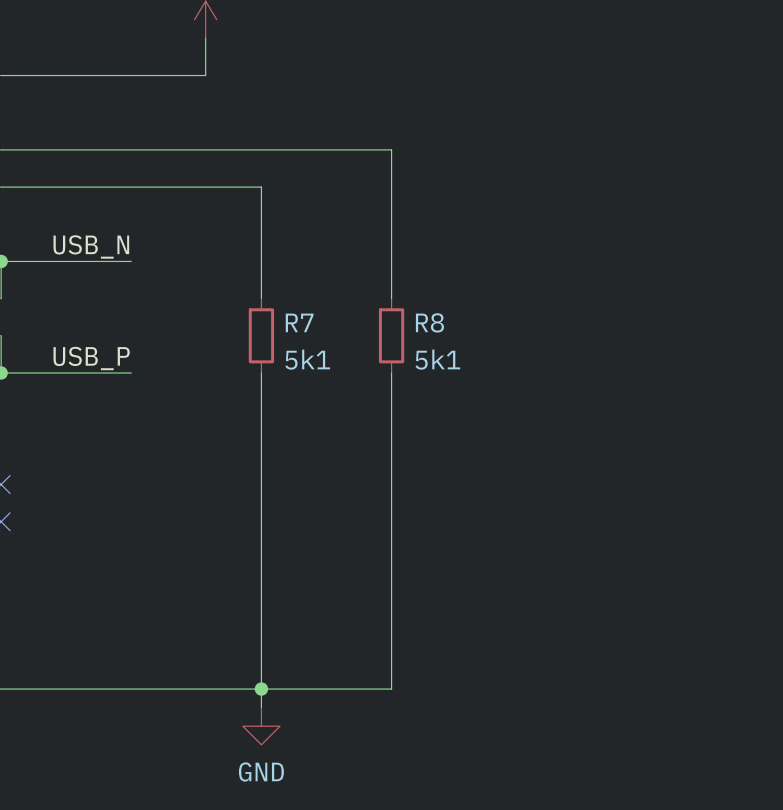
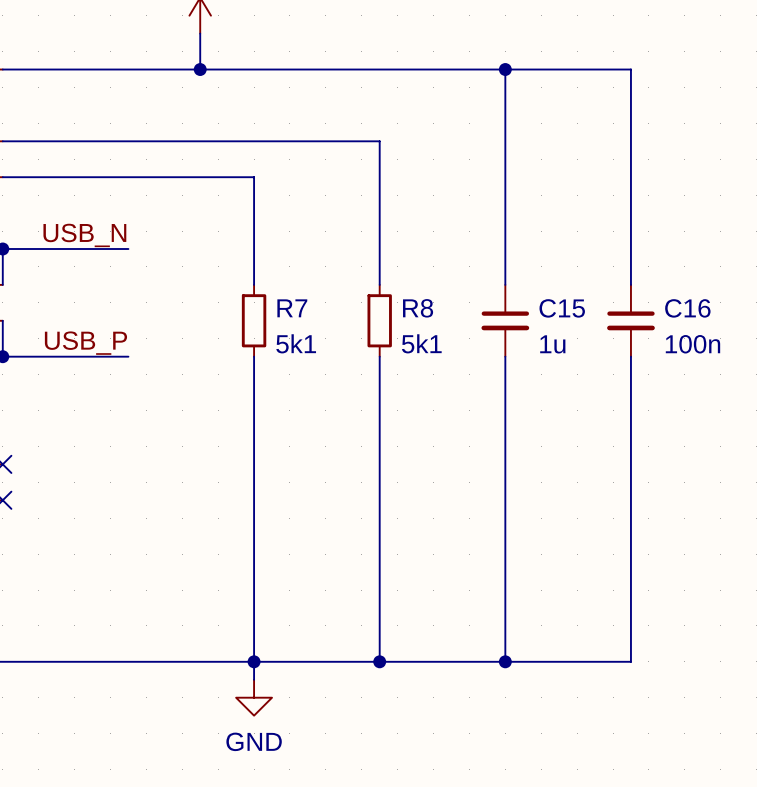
wire: none -> (200, 69) (630, 69) (630, 284)
junction: none -> (200, 69)
wire: none -> (505, 69) (505, 284)
junction: none -> (505, 69)
C15: none -> 1u (505, 320)
C16: none -> 100n (630, 320)
wire: none -> (505, 356) (505, 661)
wire: none -> (630, 356) (630, 661) (379, 661)
junction: none -> (379, 661)
junction: none -> (505, 661)

